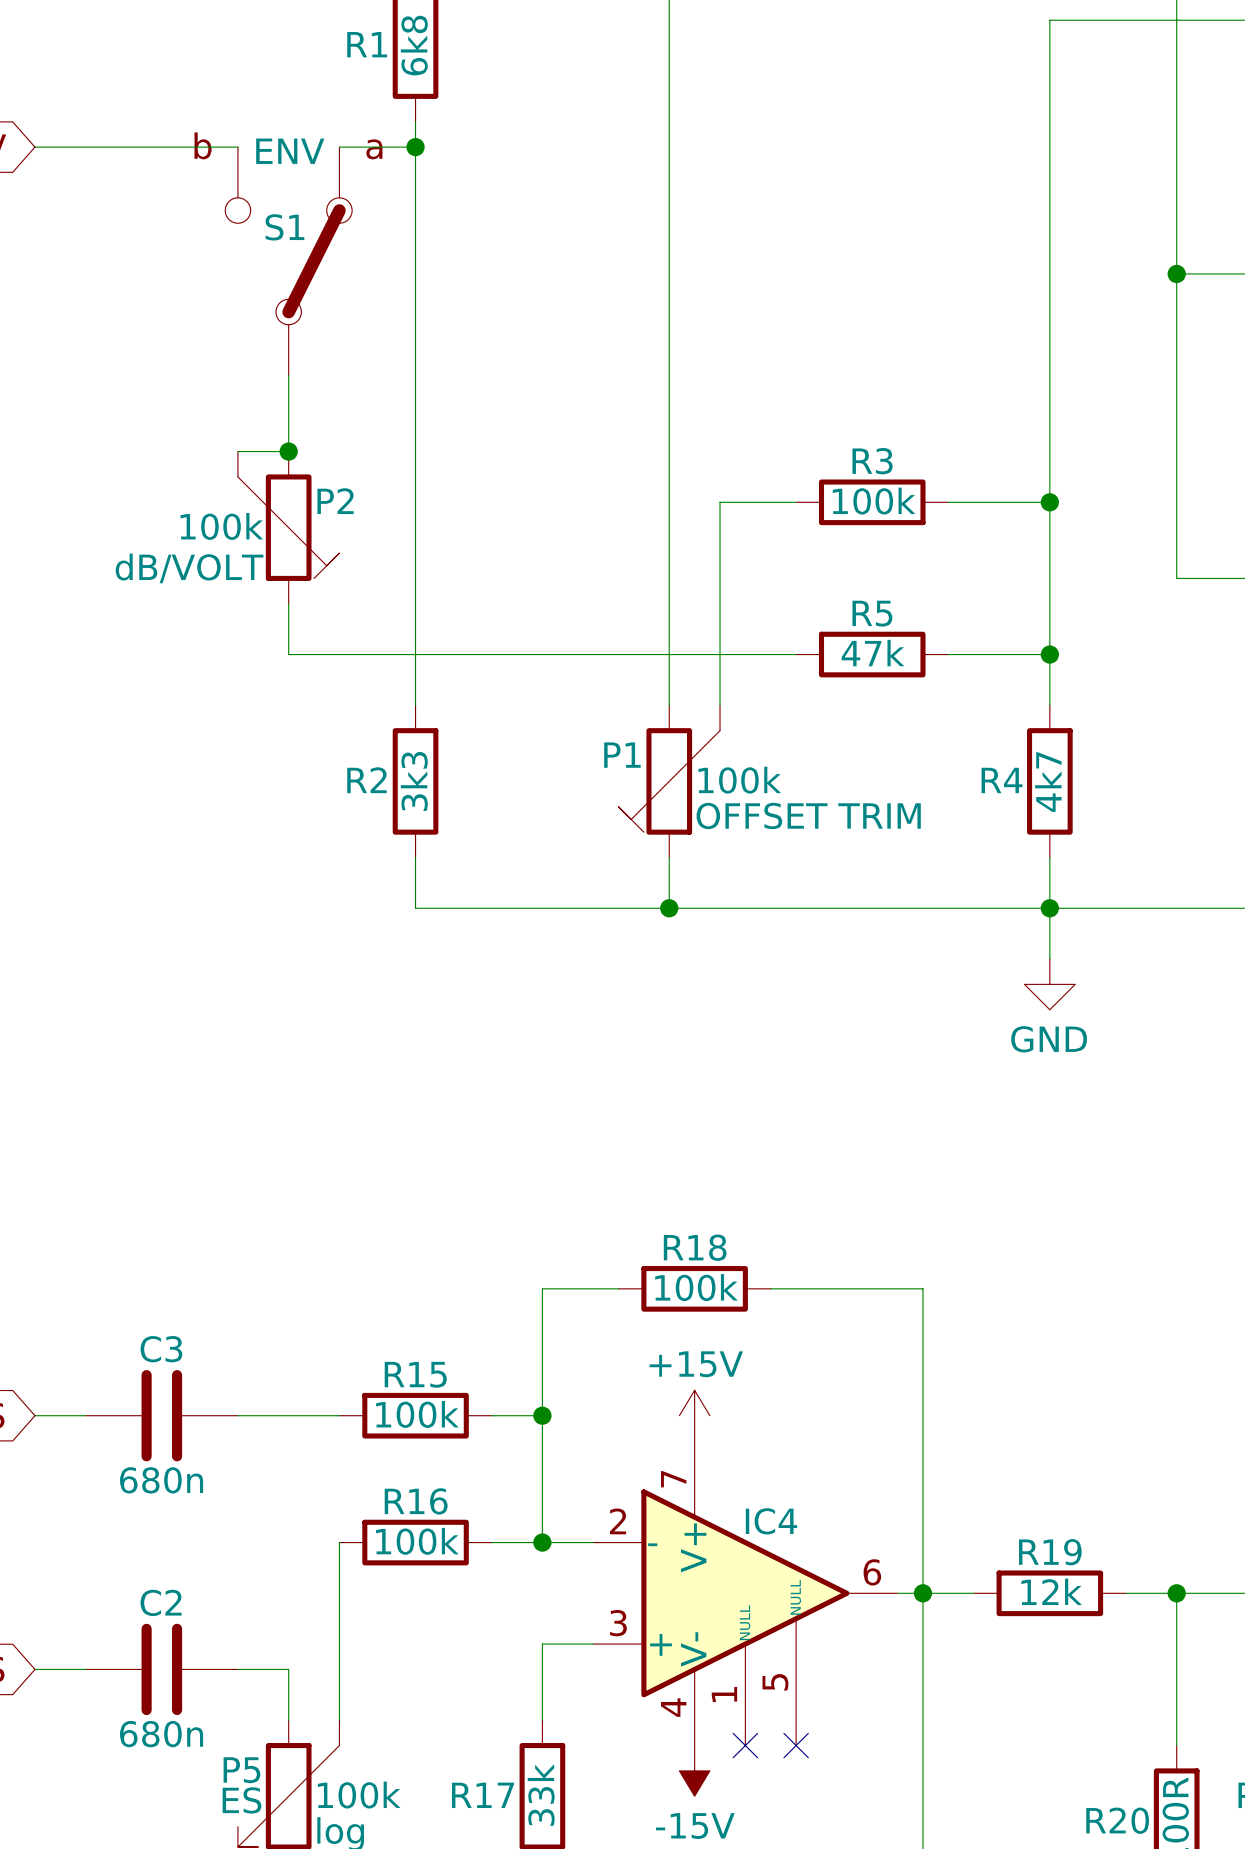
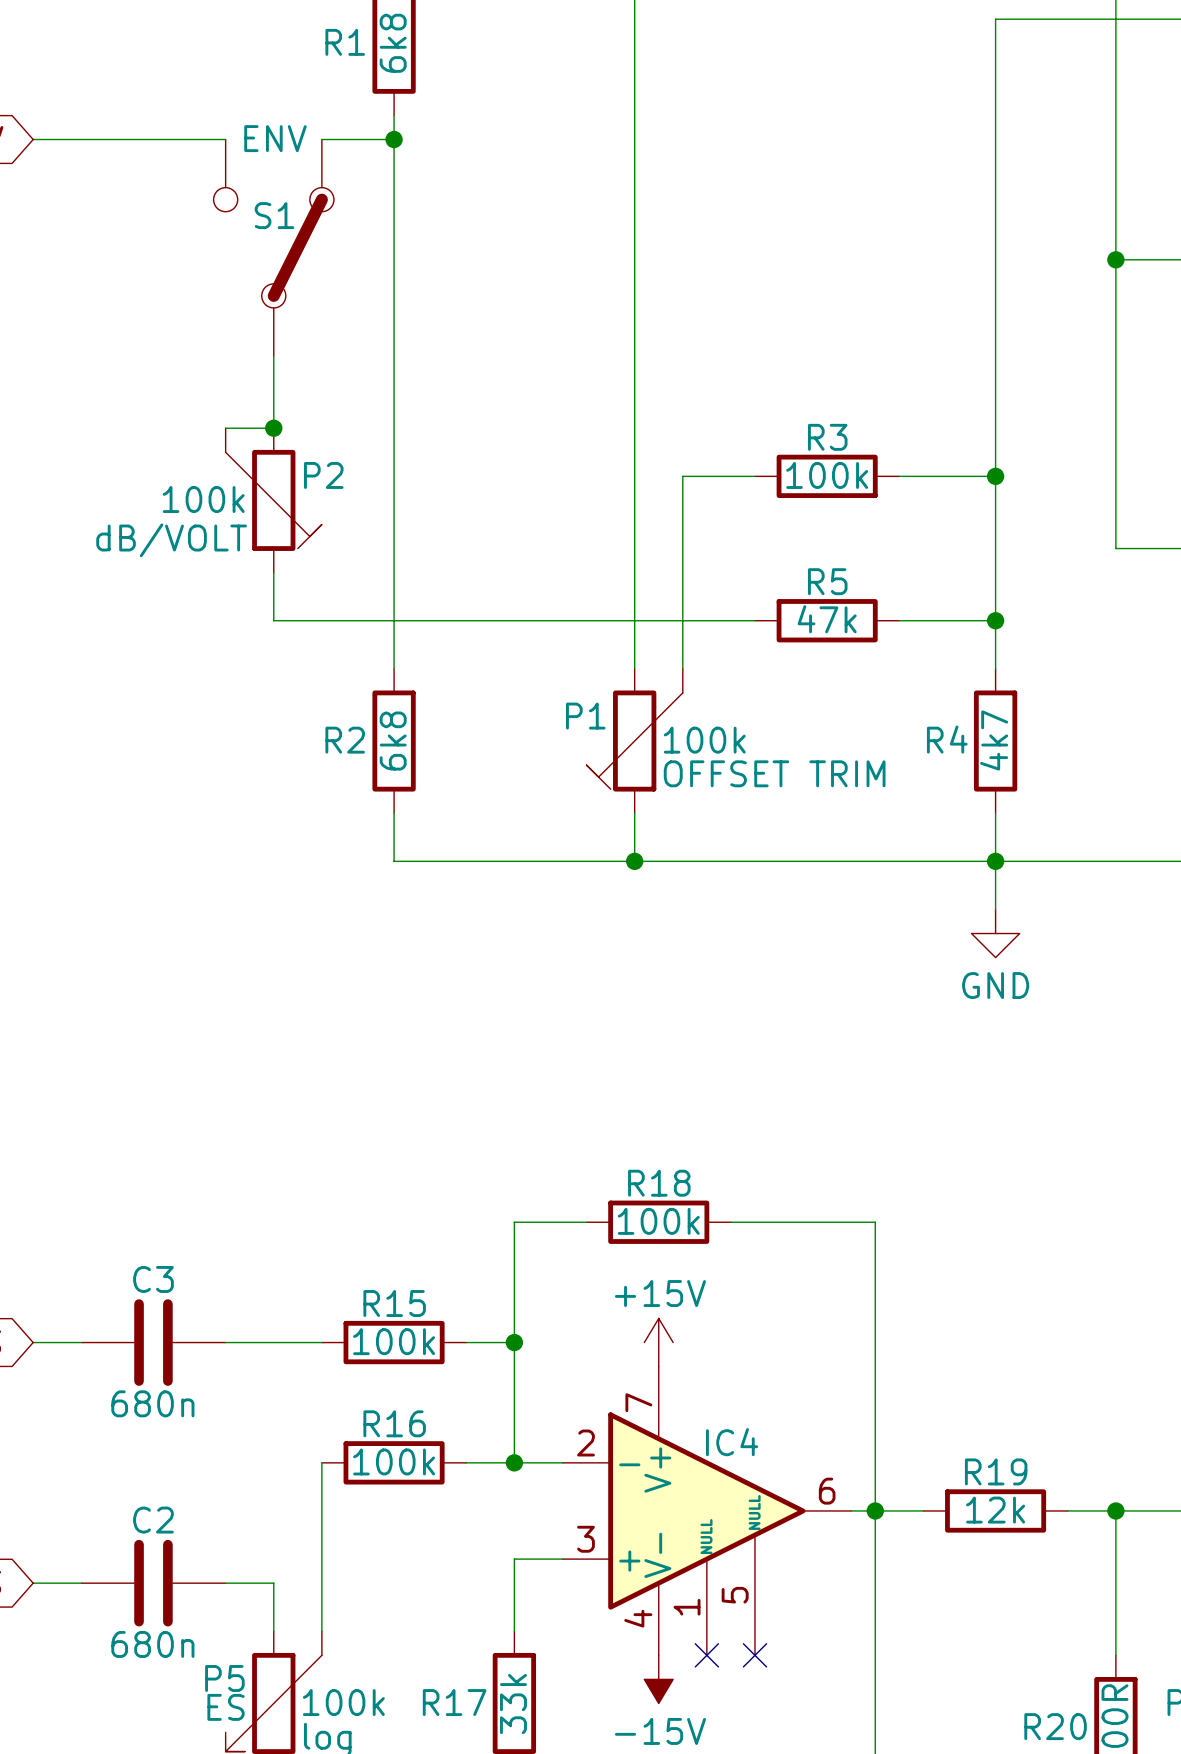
S1 text: b (203, 145) -> none
S1 value: none -> ENV (275, 138)
S1 text: a (374, 149) -> none
S1 text: ENV (290, 151) -> none
R2 value: 3k3 (414, 781) -> 6k8 (393, 741)

